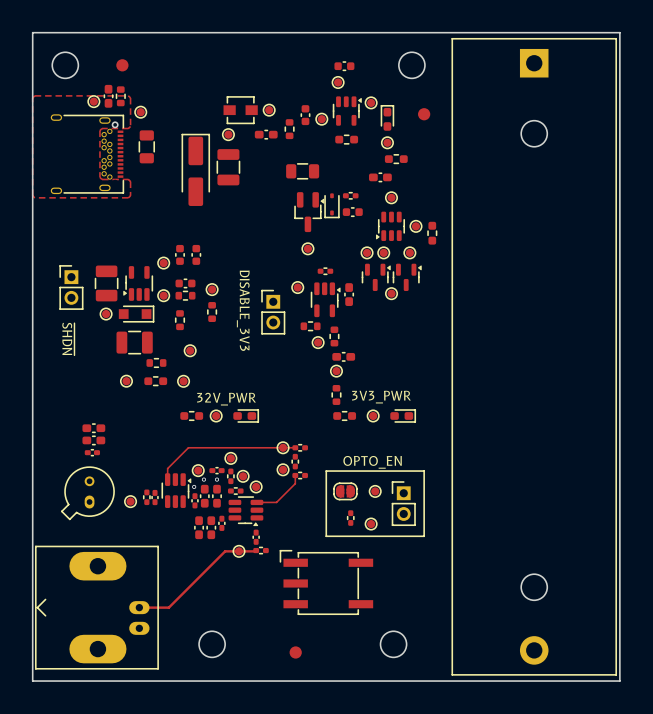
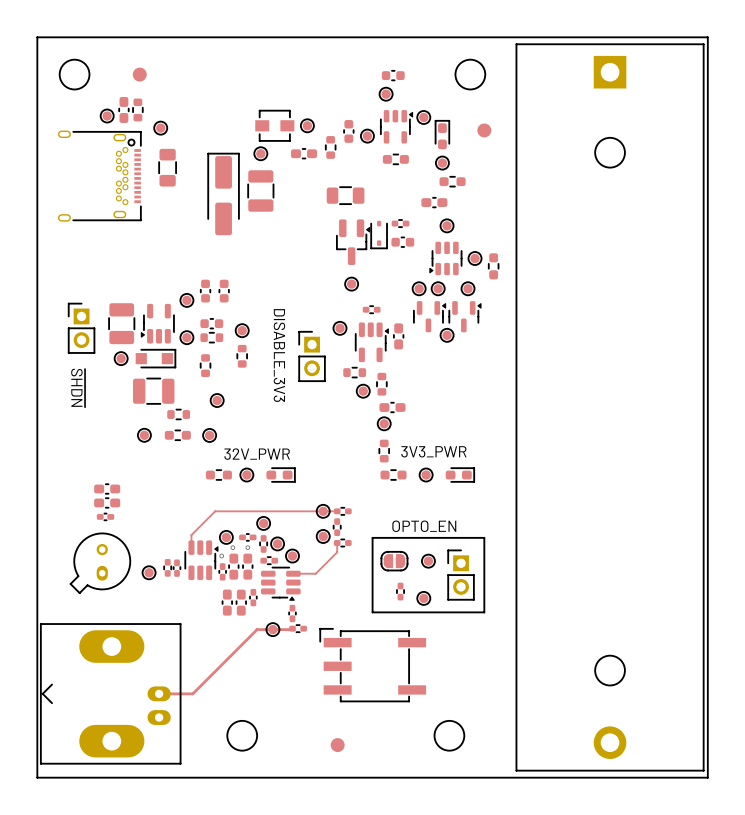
zone outline: (34, 95) (32, 97) (32, 195) (34, 197) (128, 197) (130, 195) (130, 181) (128, 179) (102, 179) (99, 177) (99, 130) (102, 128) (128, 128) (130, 126) (130, 97) (128, 95) (34, 95) -> none

